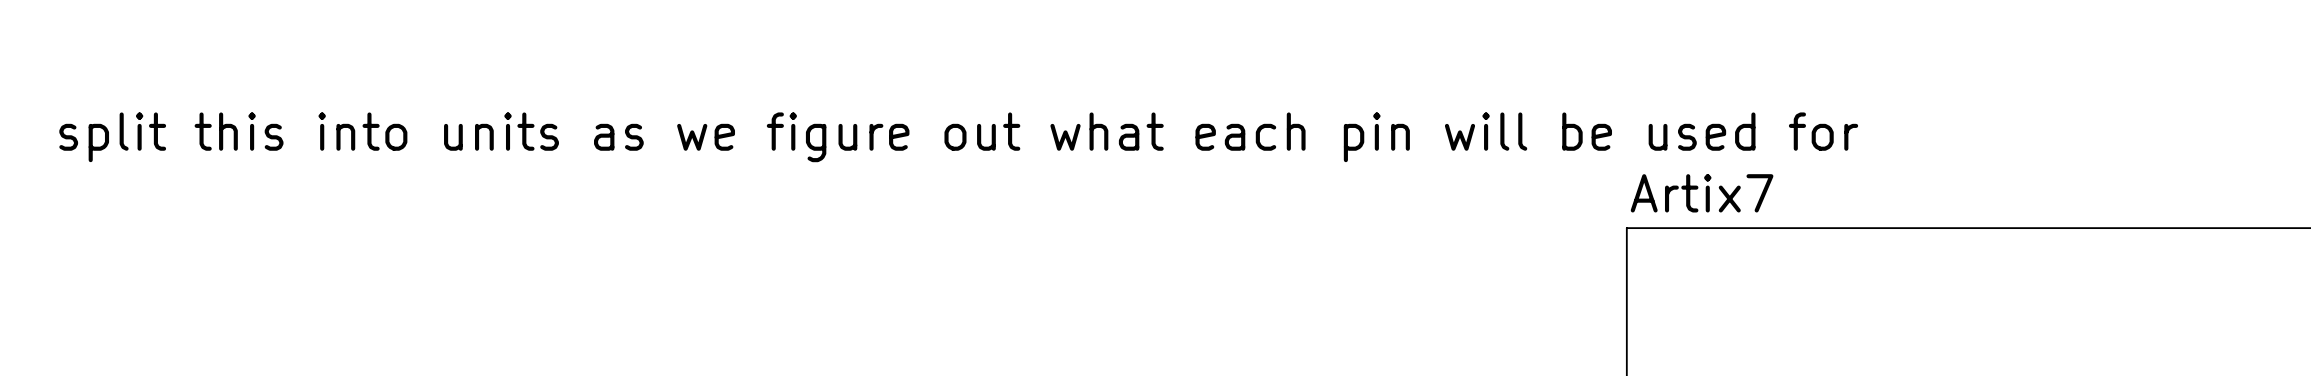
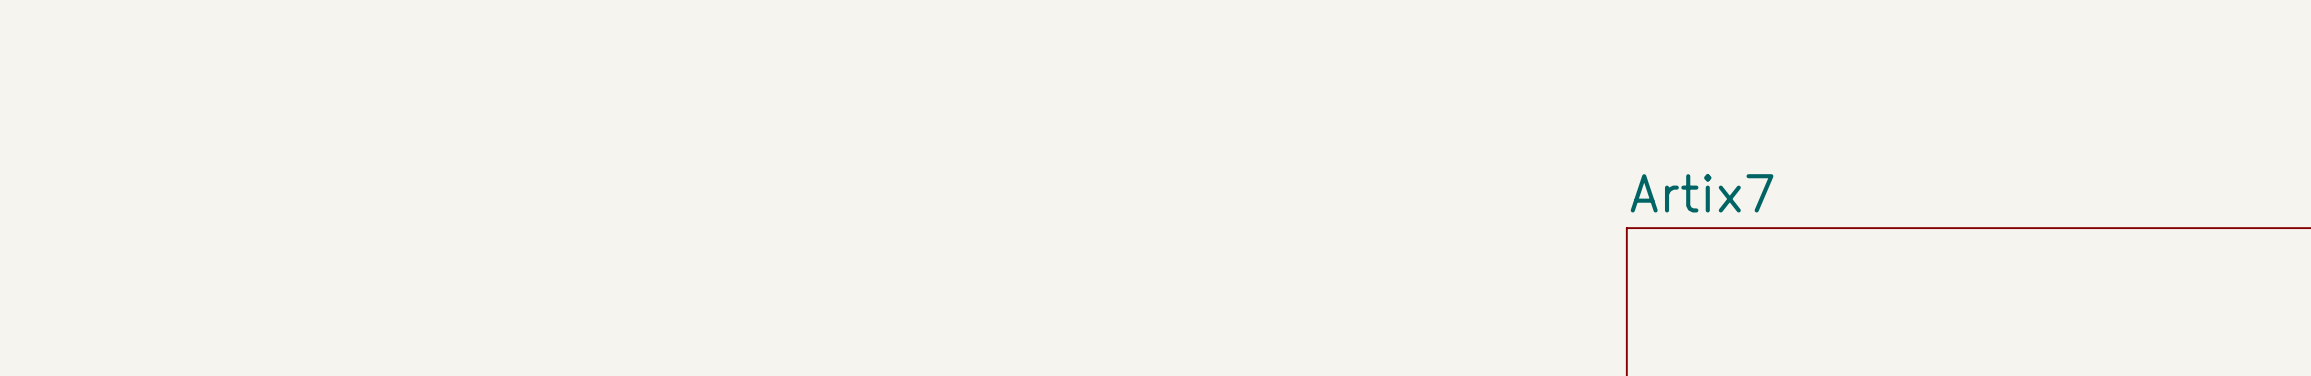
text: split this into units as we figure out what each pin will be used for (958, 137) -> none

